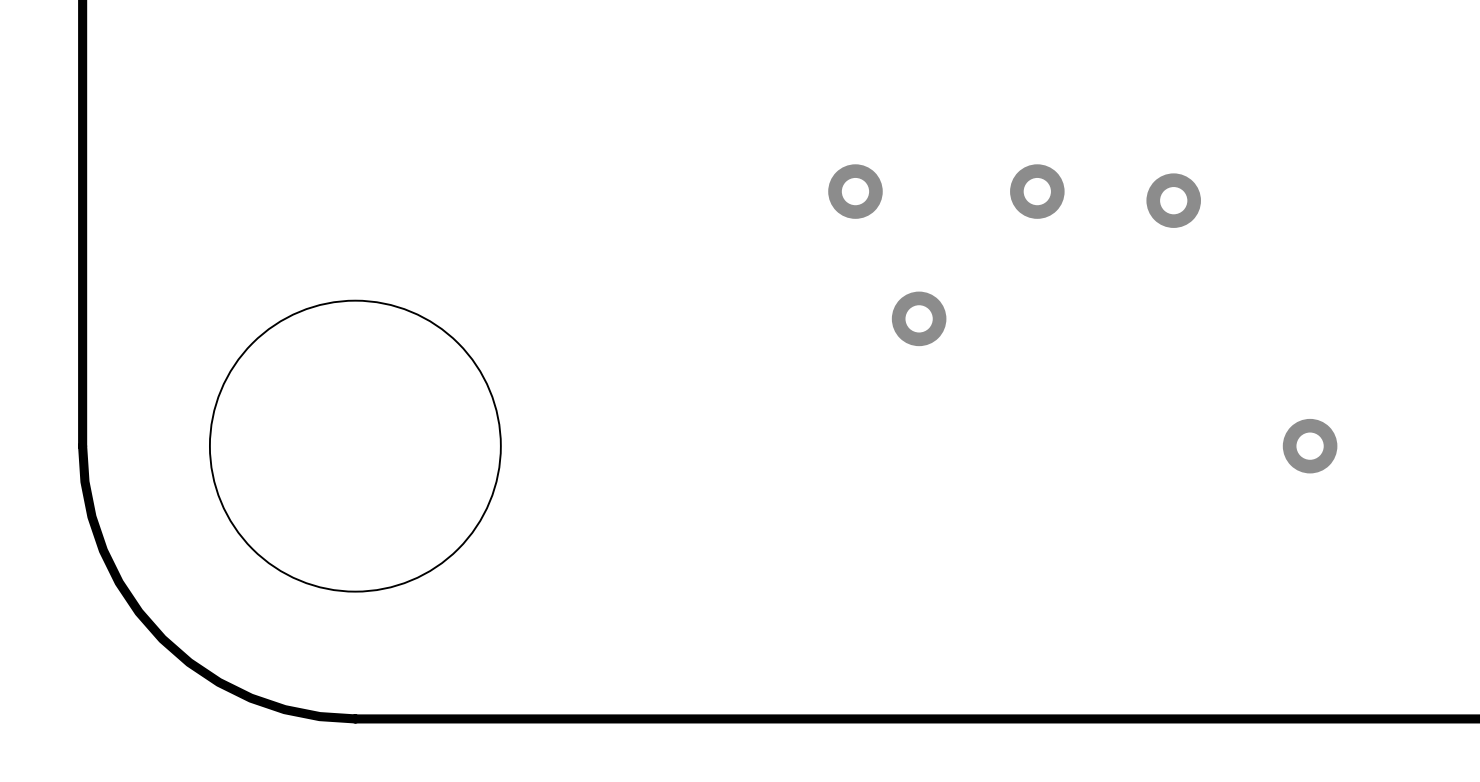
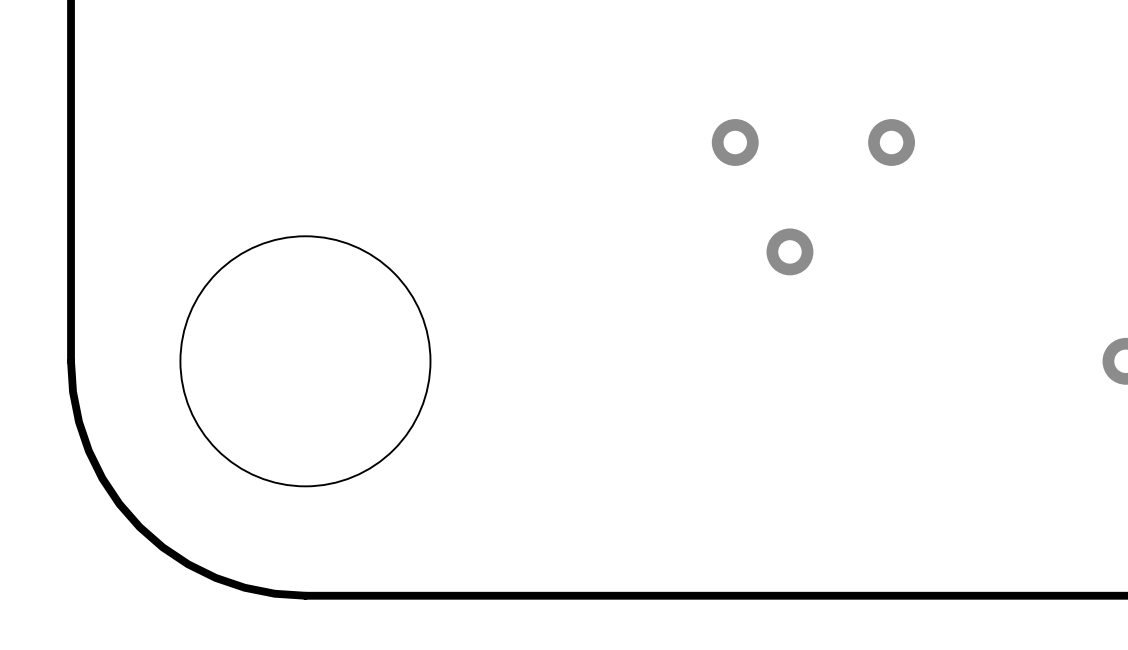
via: (1173, 200) -> none

